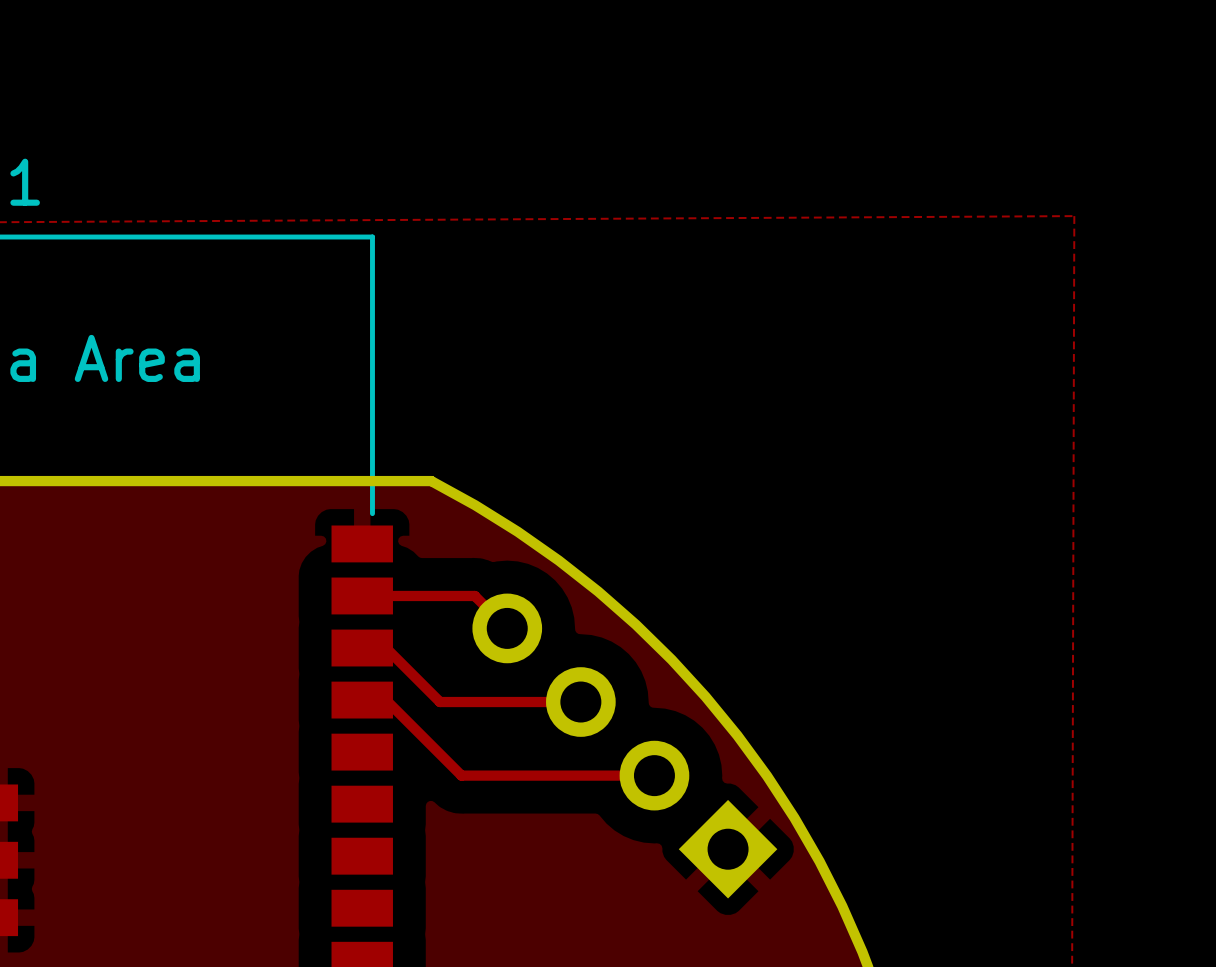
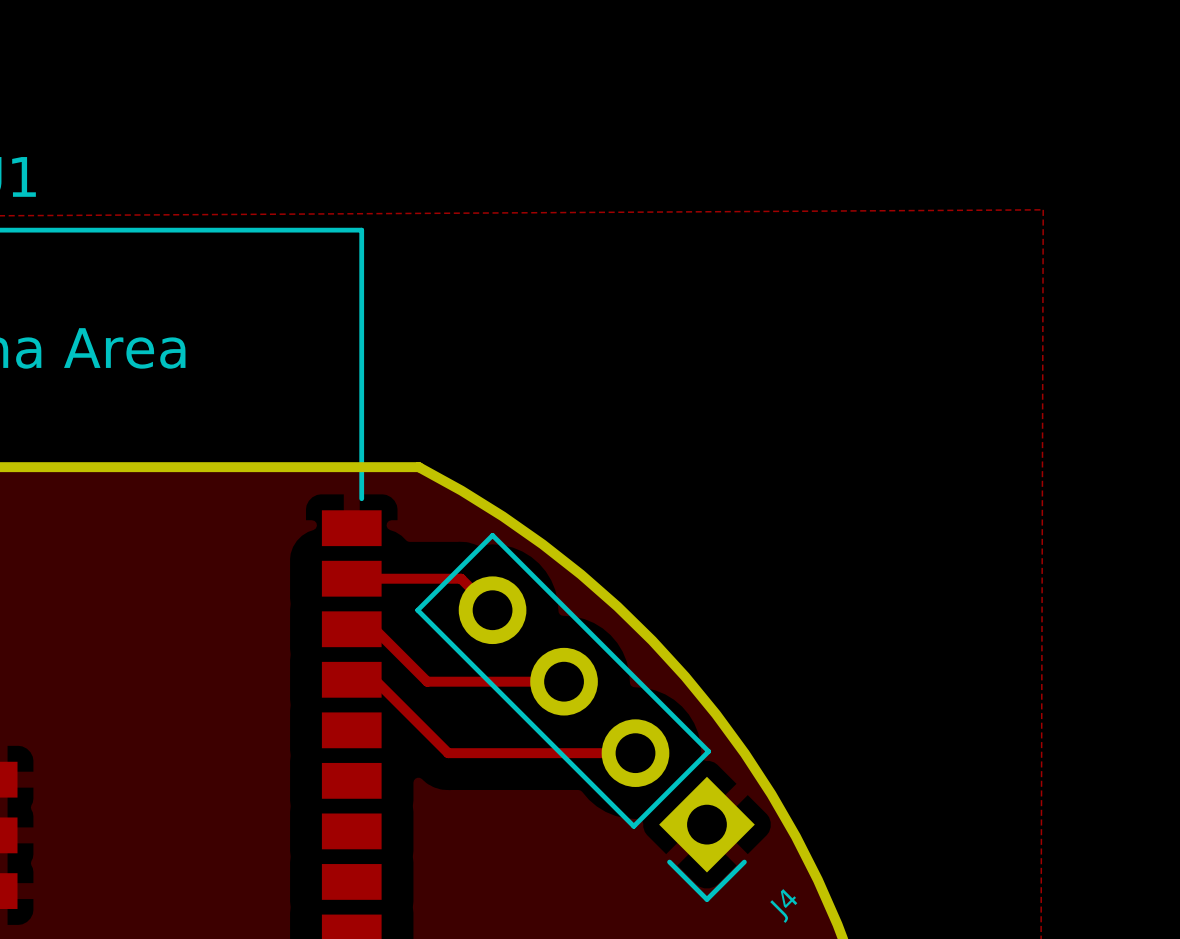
J4 side: bottom (624, 746) -> top (585, 717)

